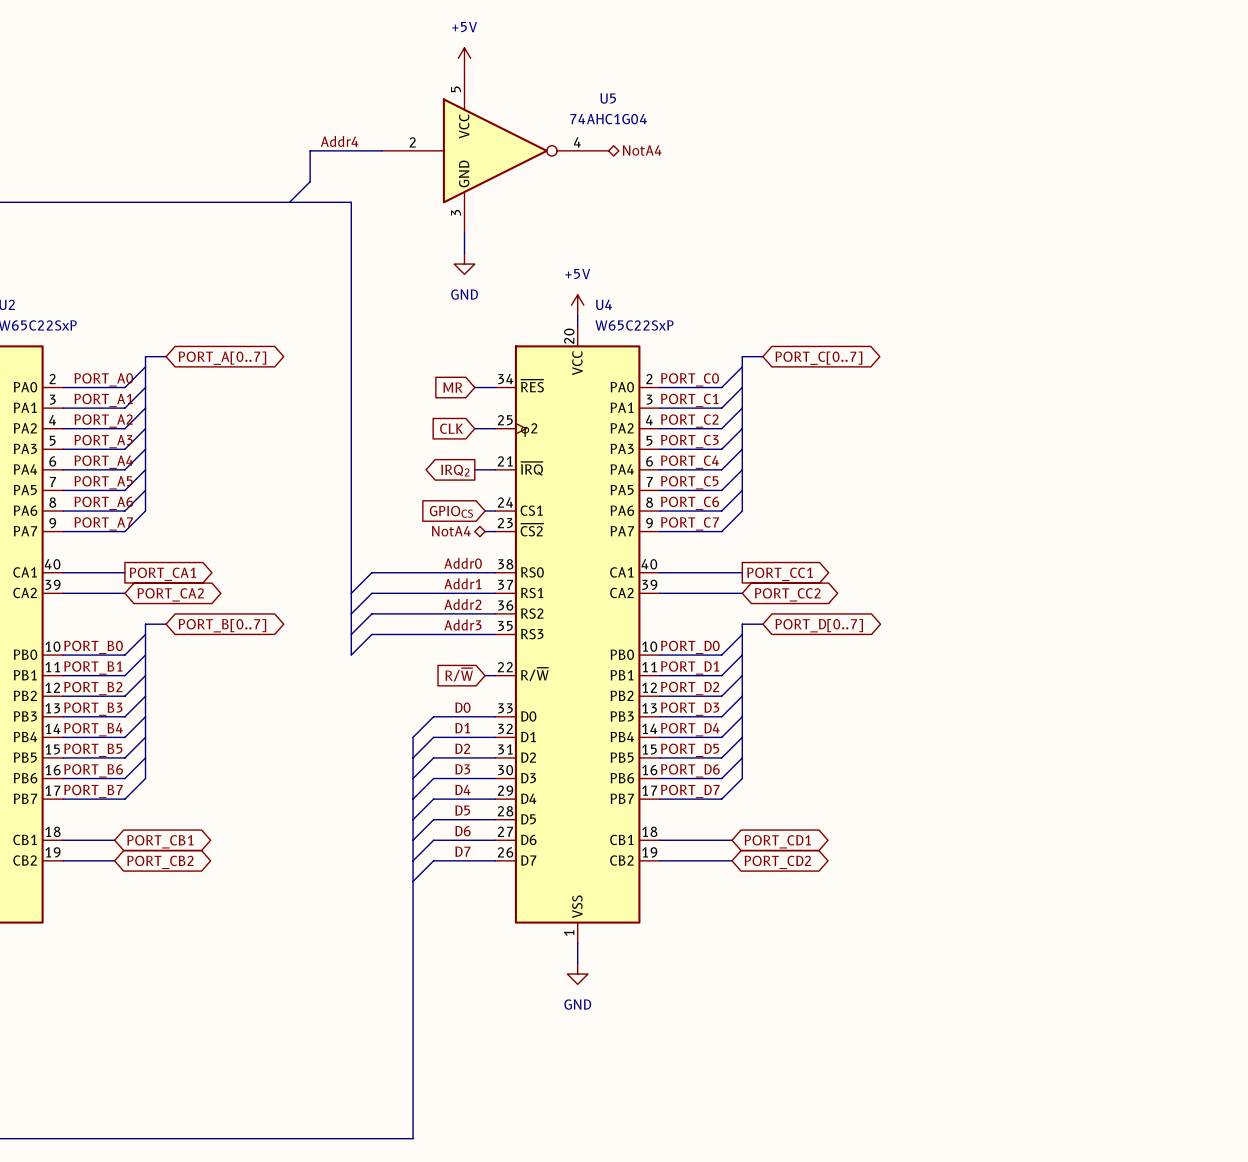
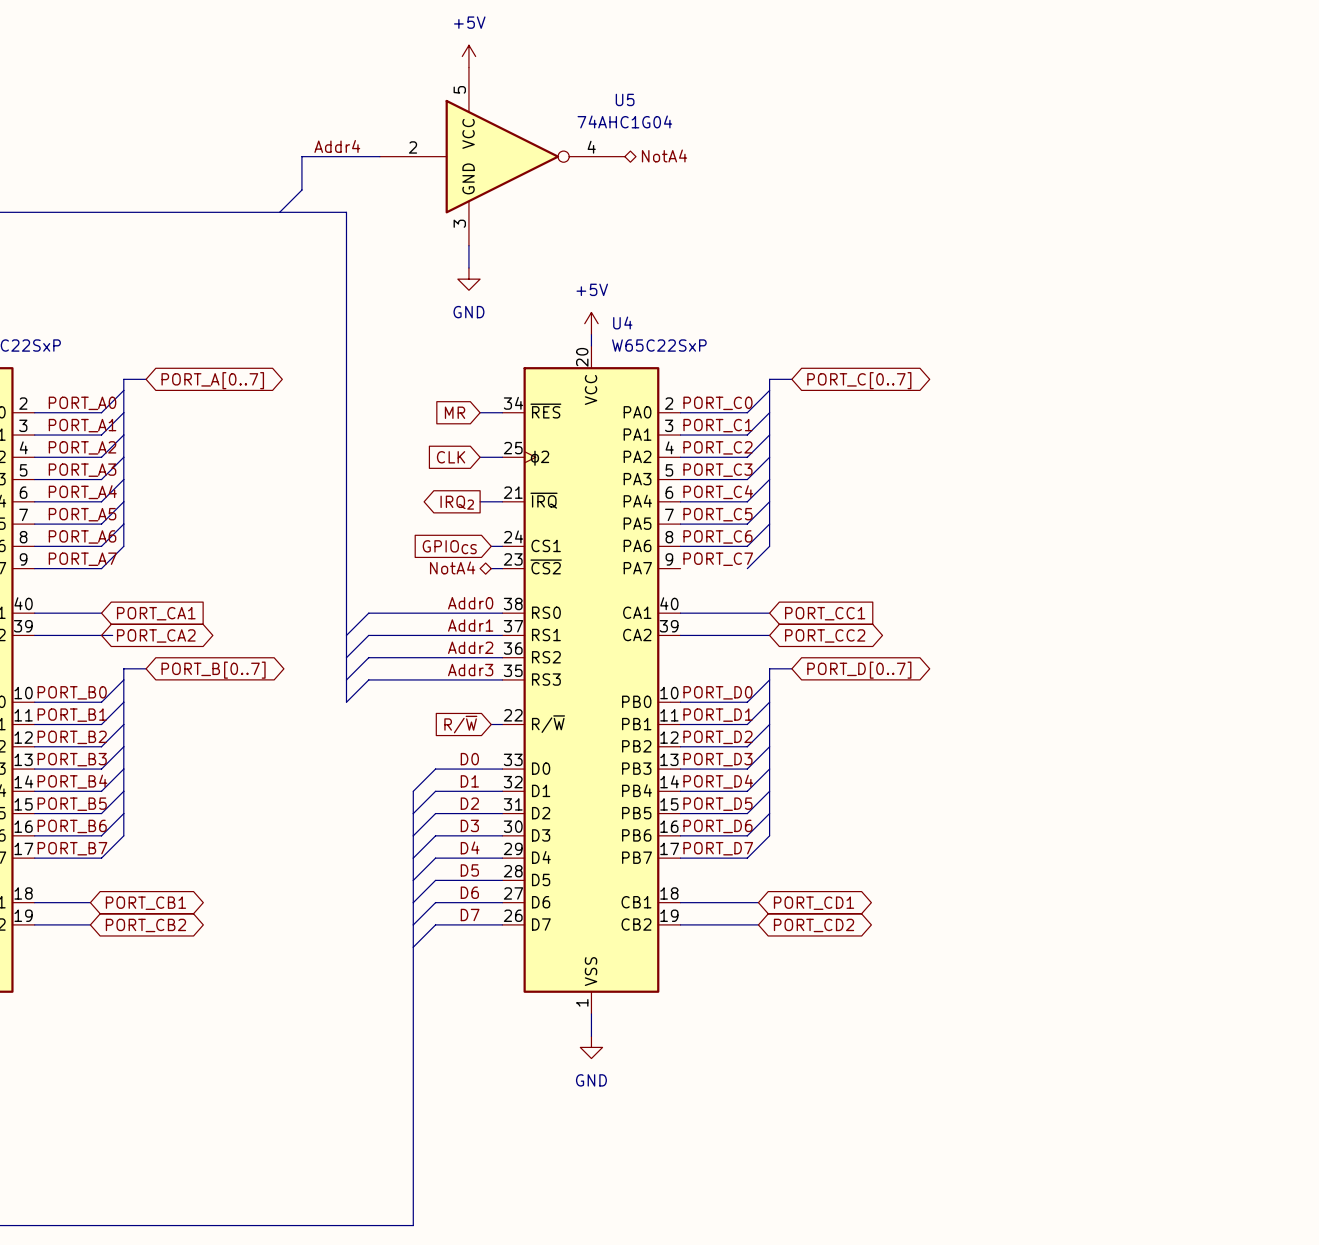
wire: (659, 531) (721, 531) -> none
global label shape: output (163, 574) -> input (156, 613)
global label shape: output (780, 574) -> input (825, 613)
wire: none -> (101, 635) (112, 635)

